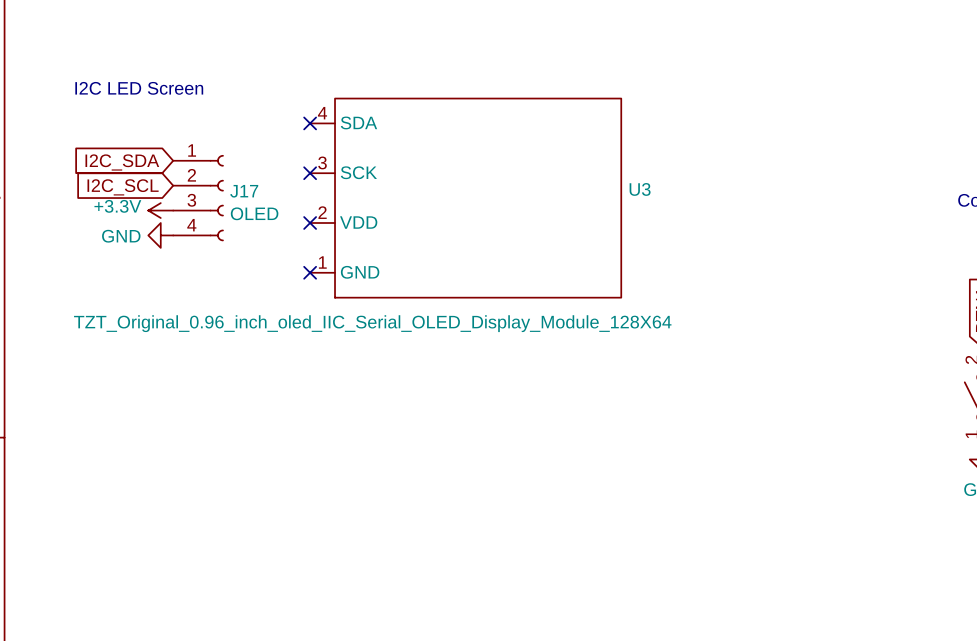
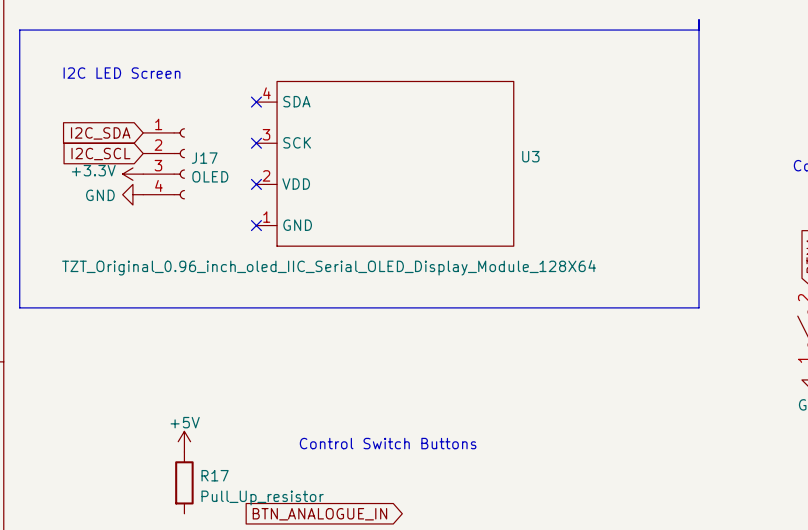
line: none -> (699, 19) (699, 307) (19, 307) (19, 30) (699, 30)
power symbol: none -> +5V (184, 441)
text: none -> Control Switch Buttons (388, 443)
R17: none -> Pull_Up_resistor (184, 482)
global label: none -> BTN_ANALOGUE_IN (319, 514)

